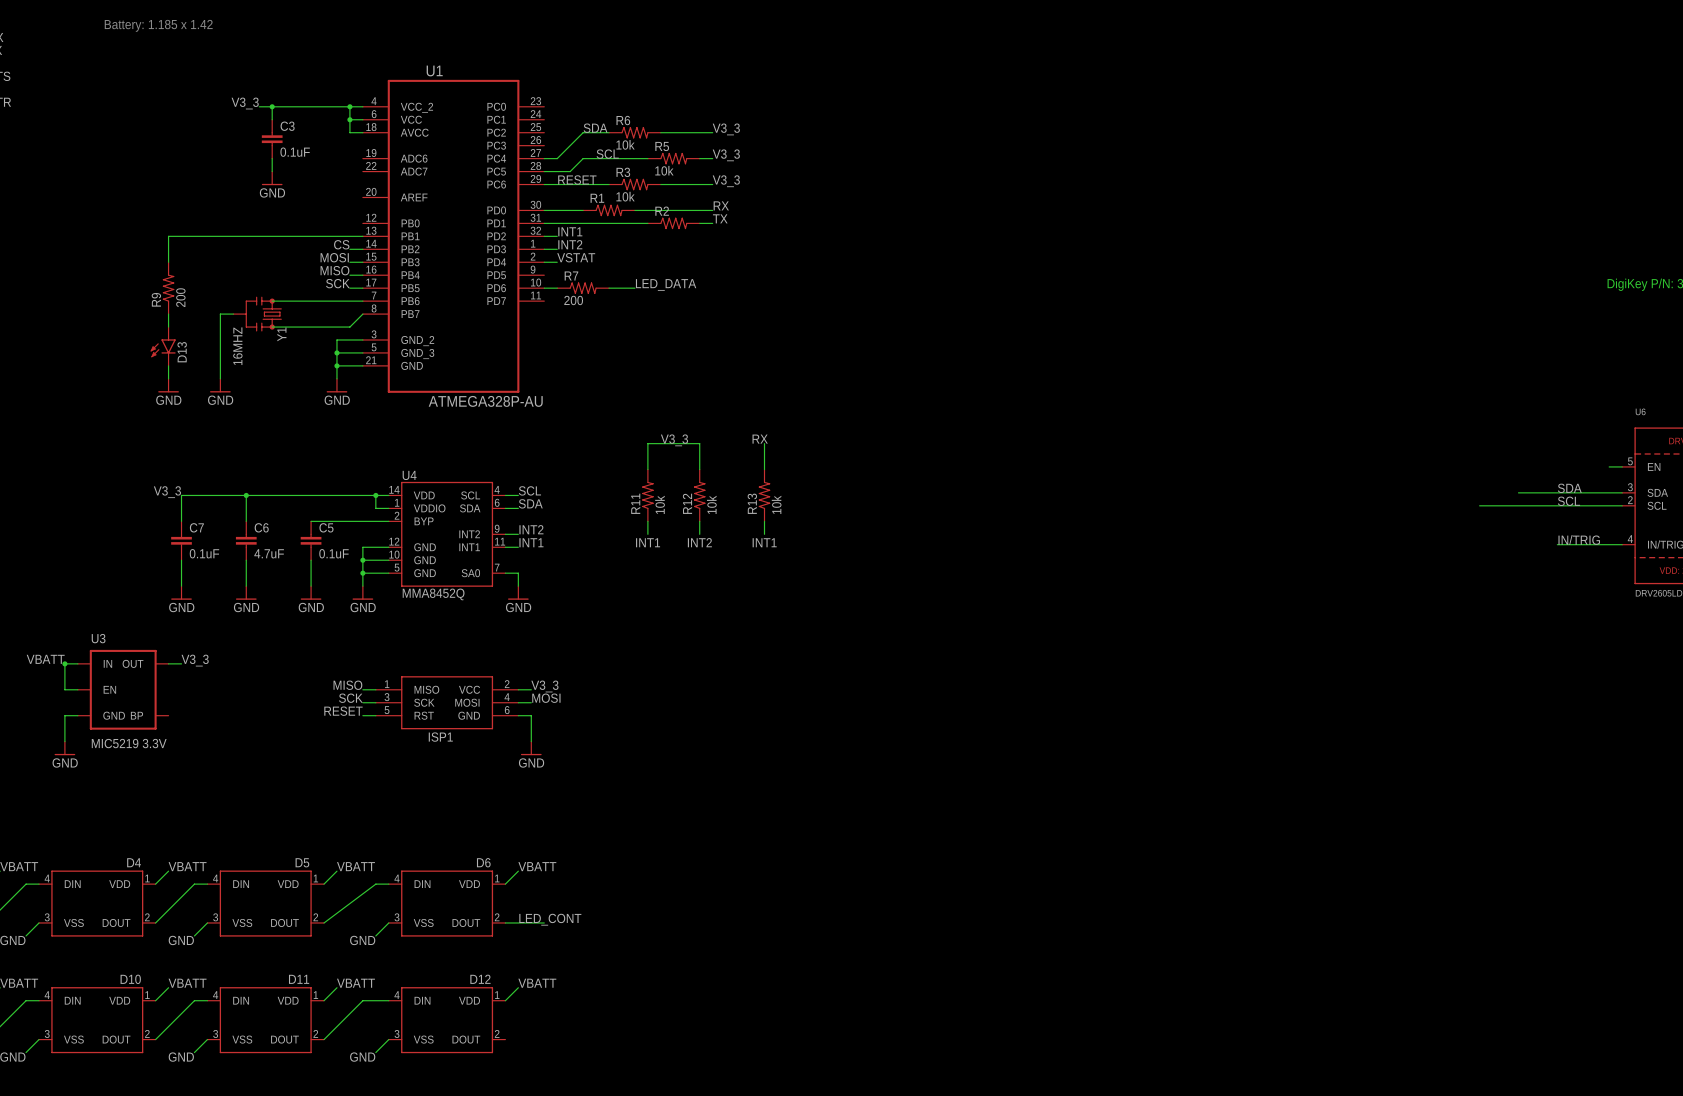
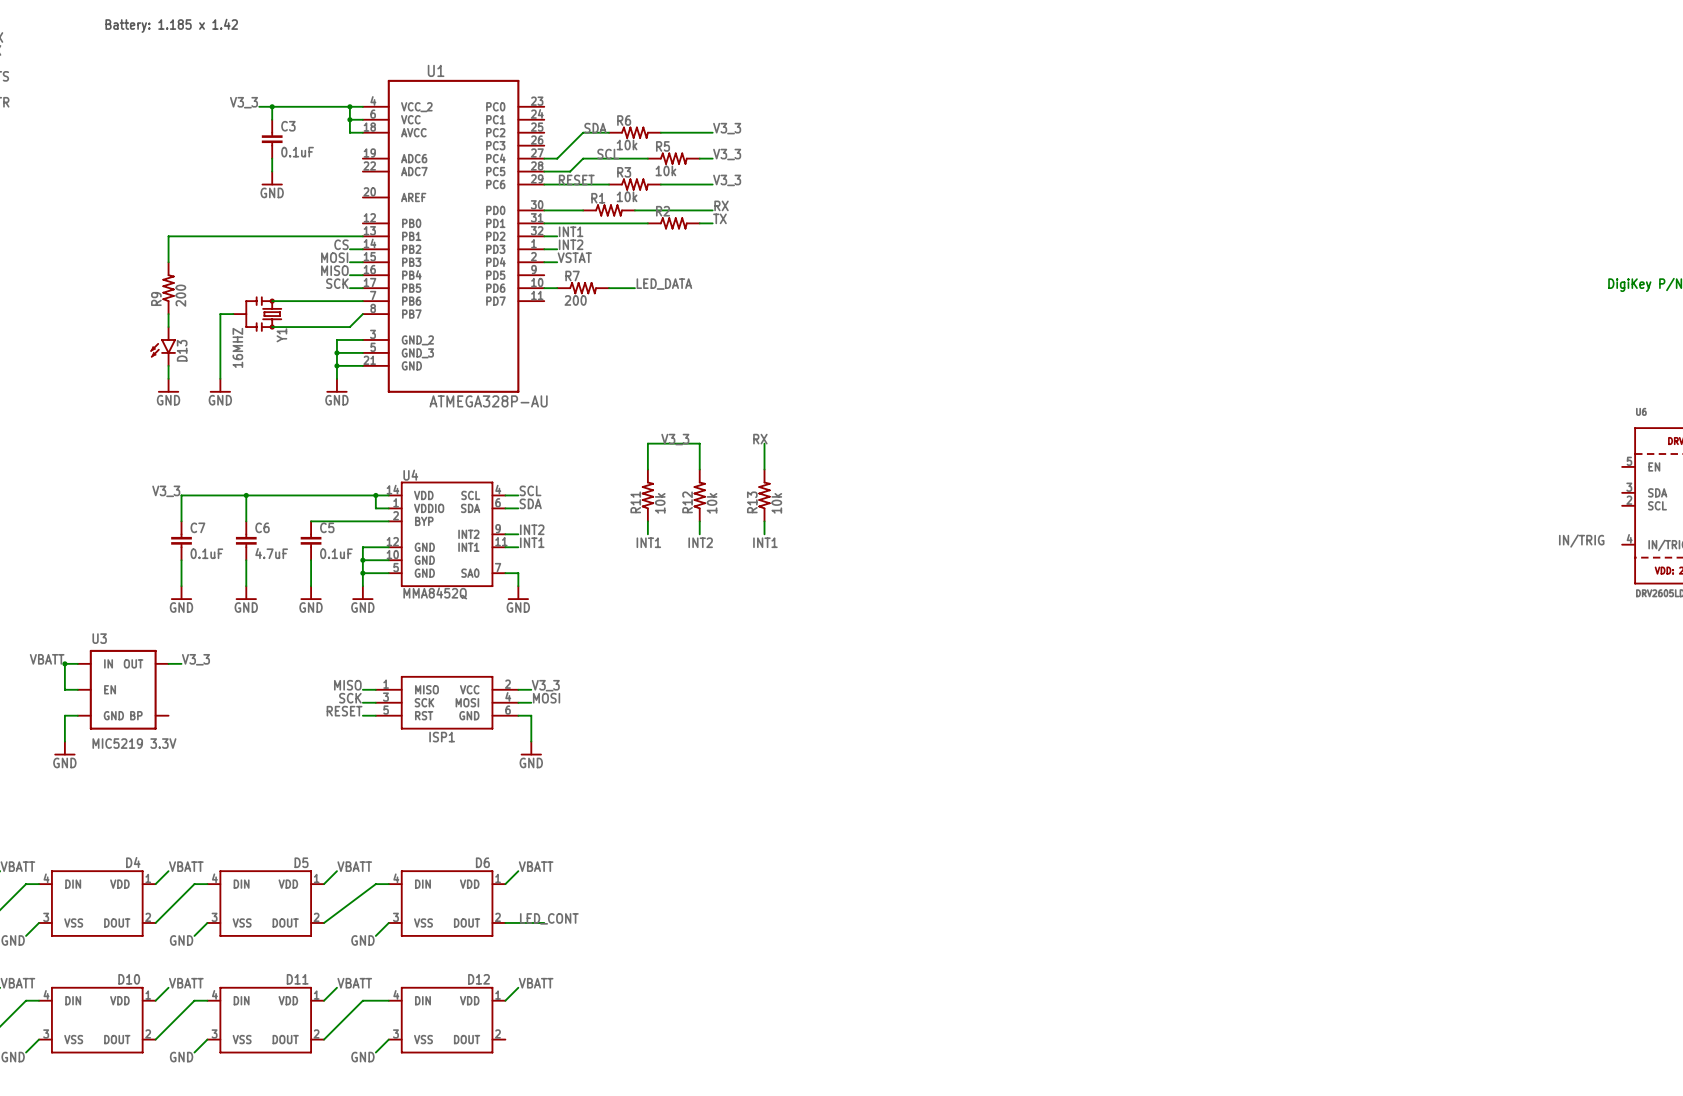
wire: (1609, 466) (1622, 466) -> none
label: SDA (1569, 488) -> none
wire: (1518, 492) (1622, 492) -> none
label: SCL (1568, 501) -> none
wire: (1479, 505) (1622, 505) -> none
wire: (1557, 544) (1622, 544) -> none

